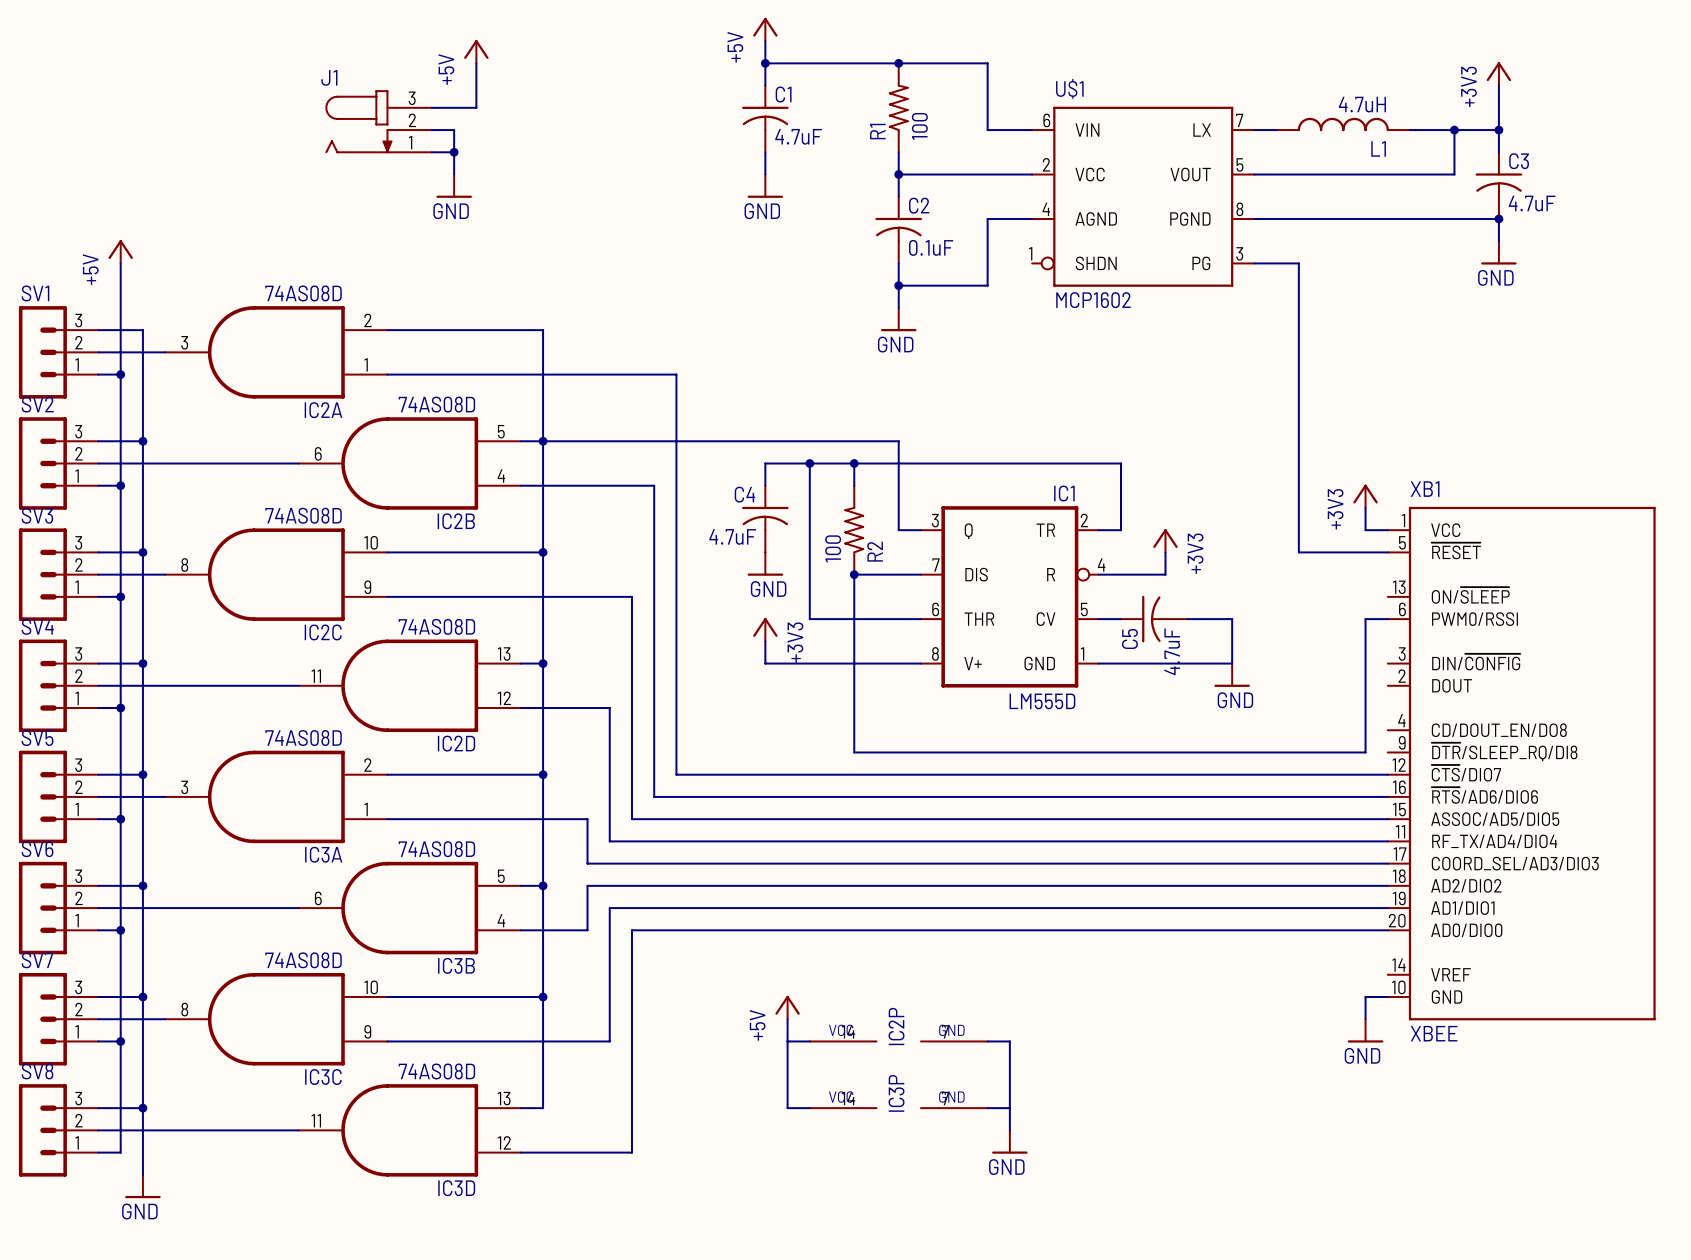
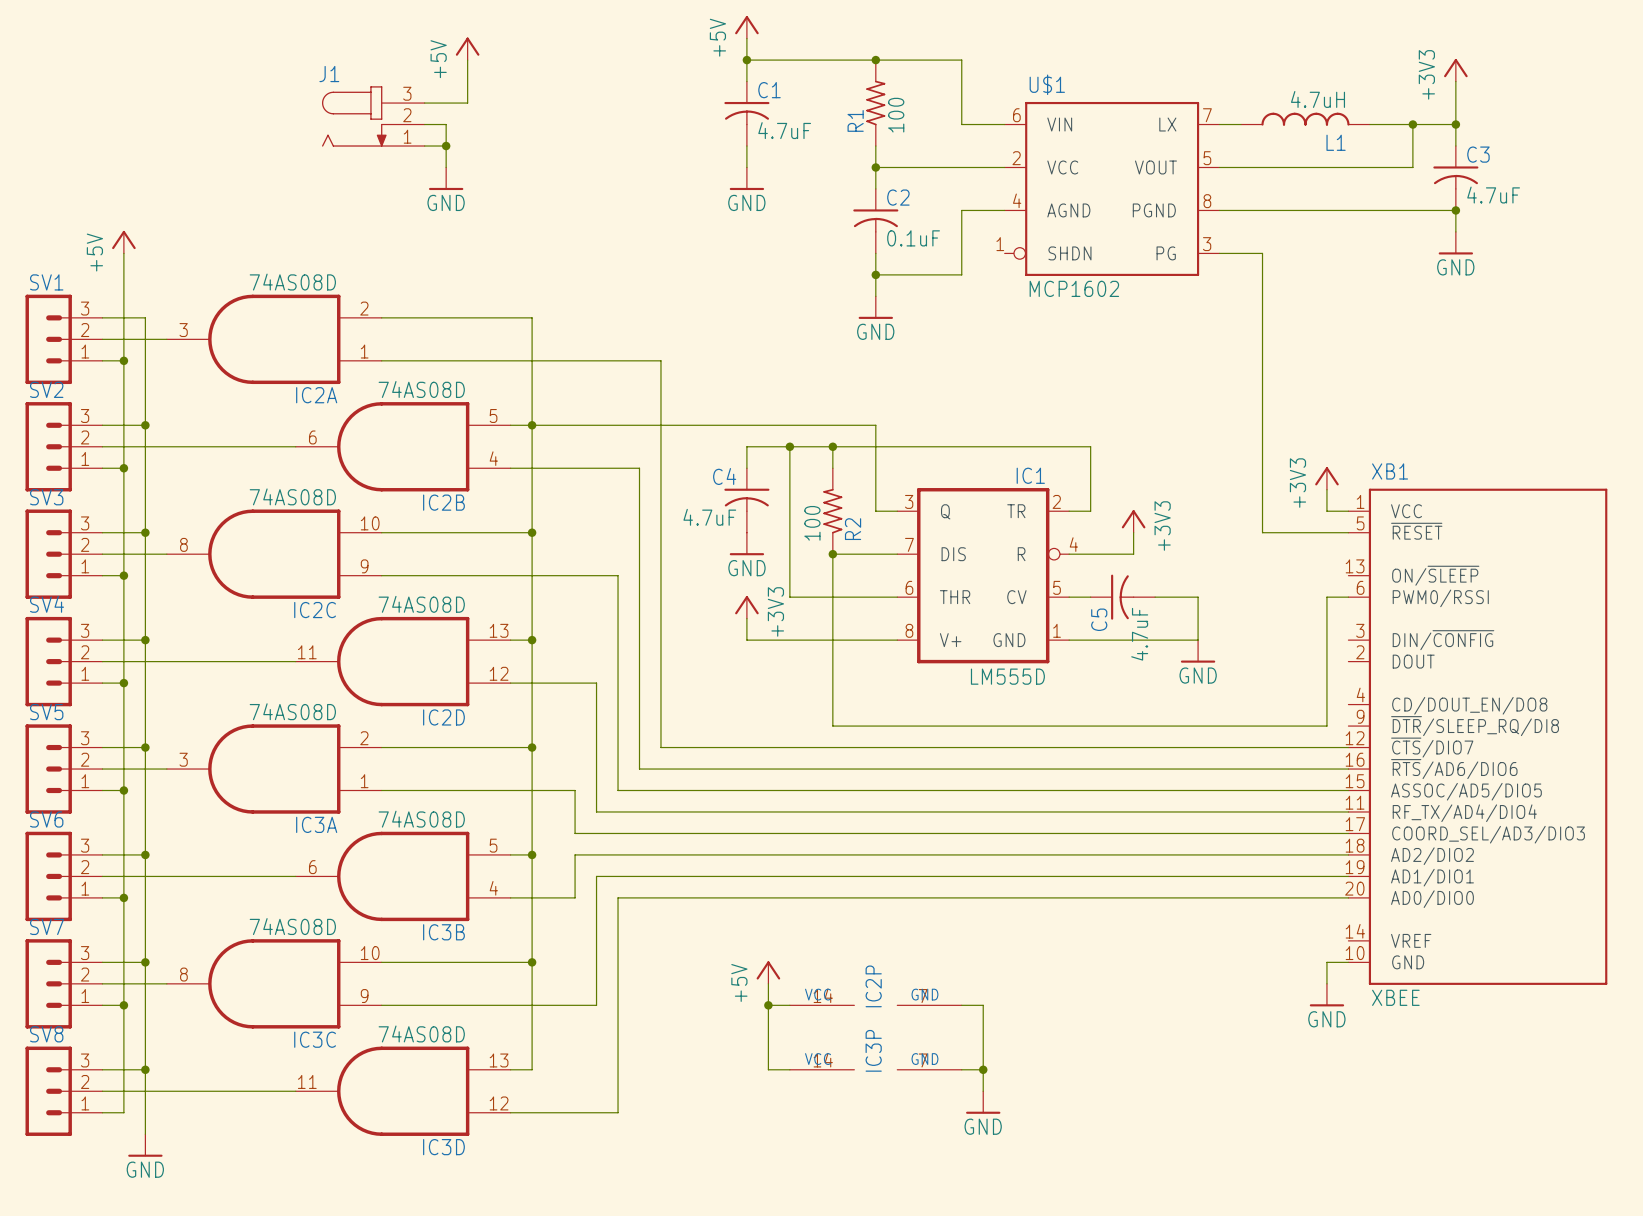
junction: none -> (768, 1005)
junction: none -> (983, 1069)

